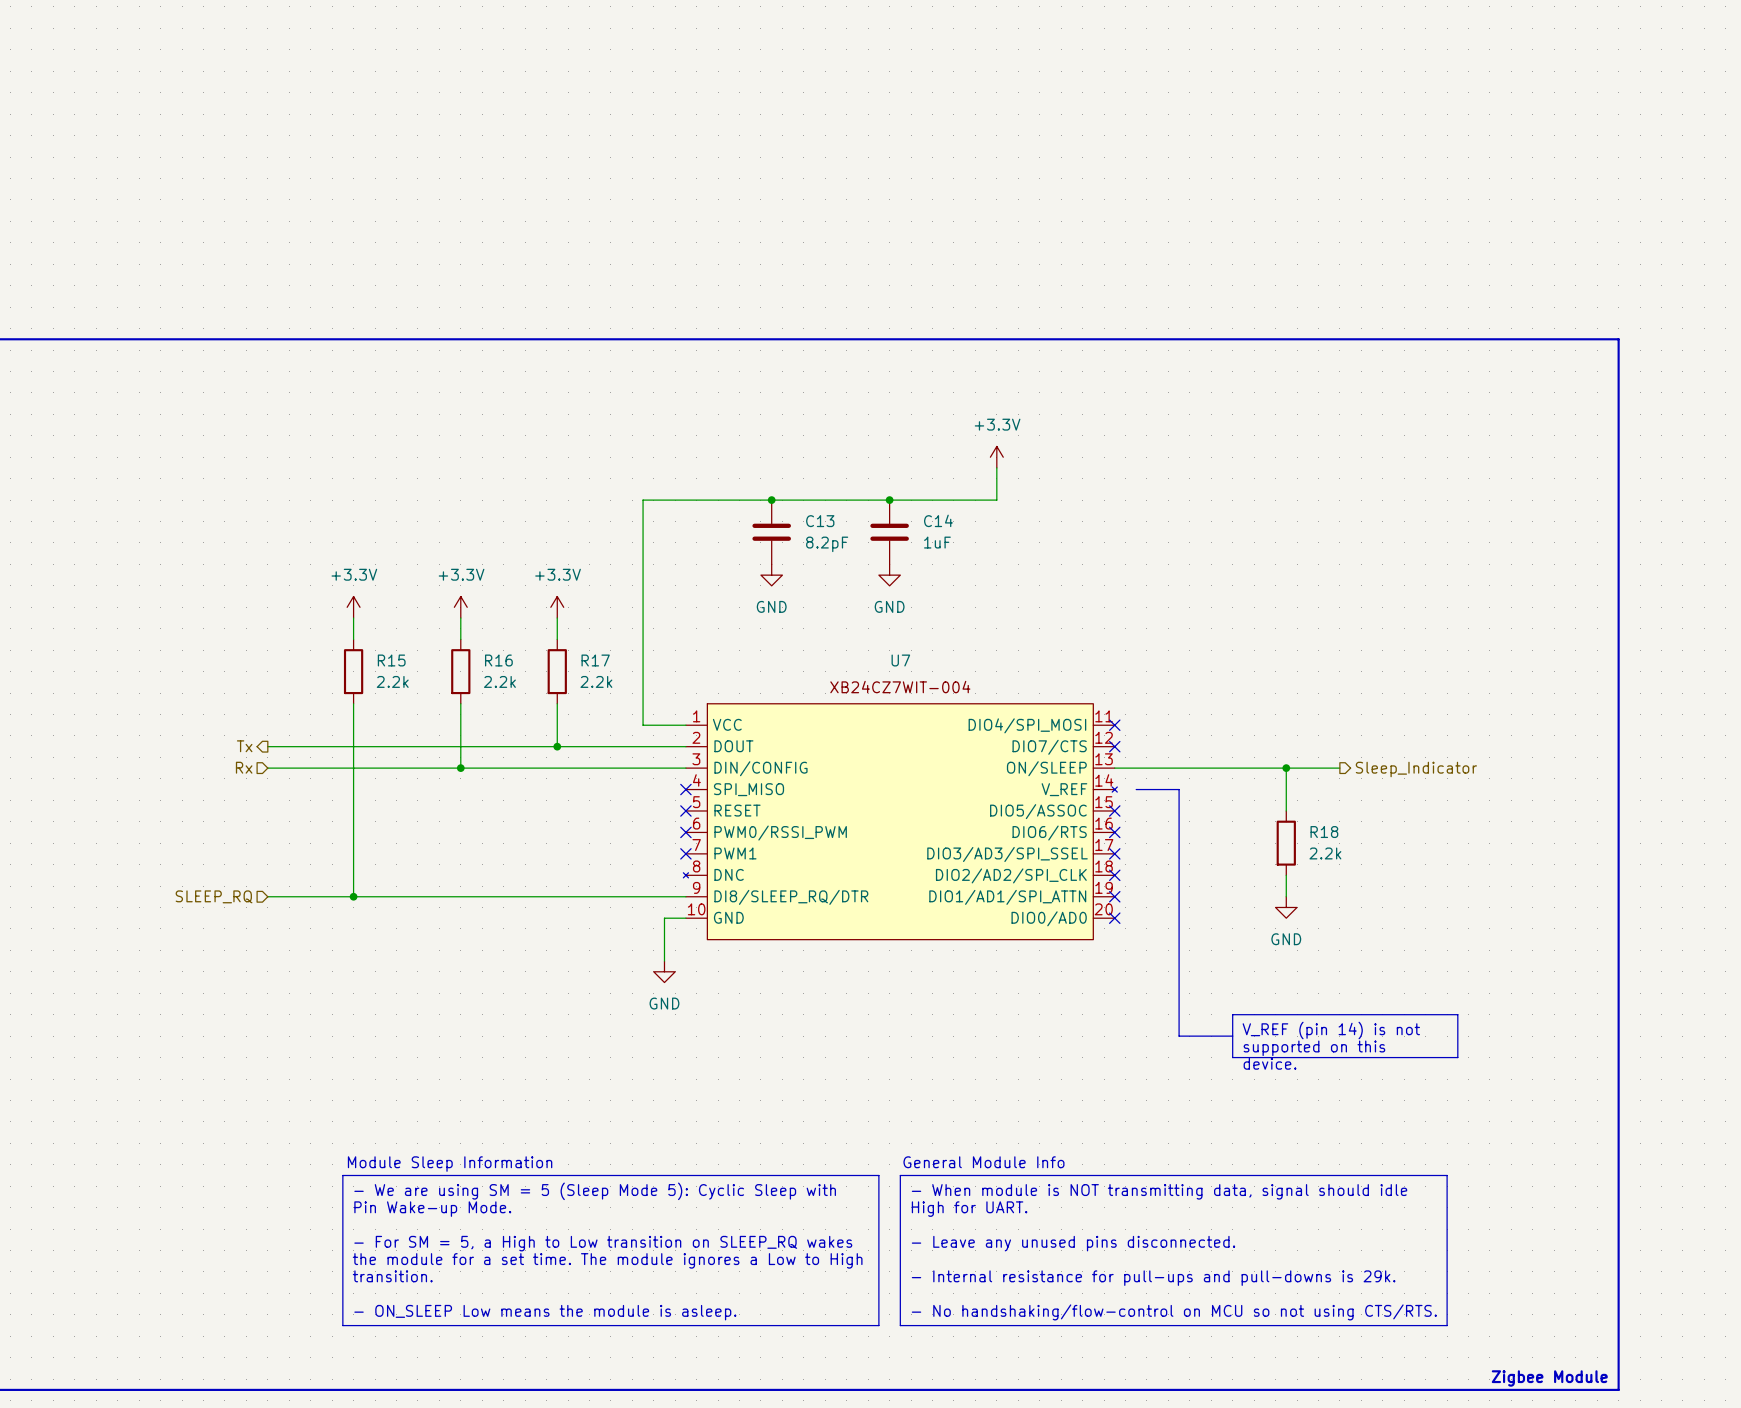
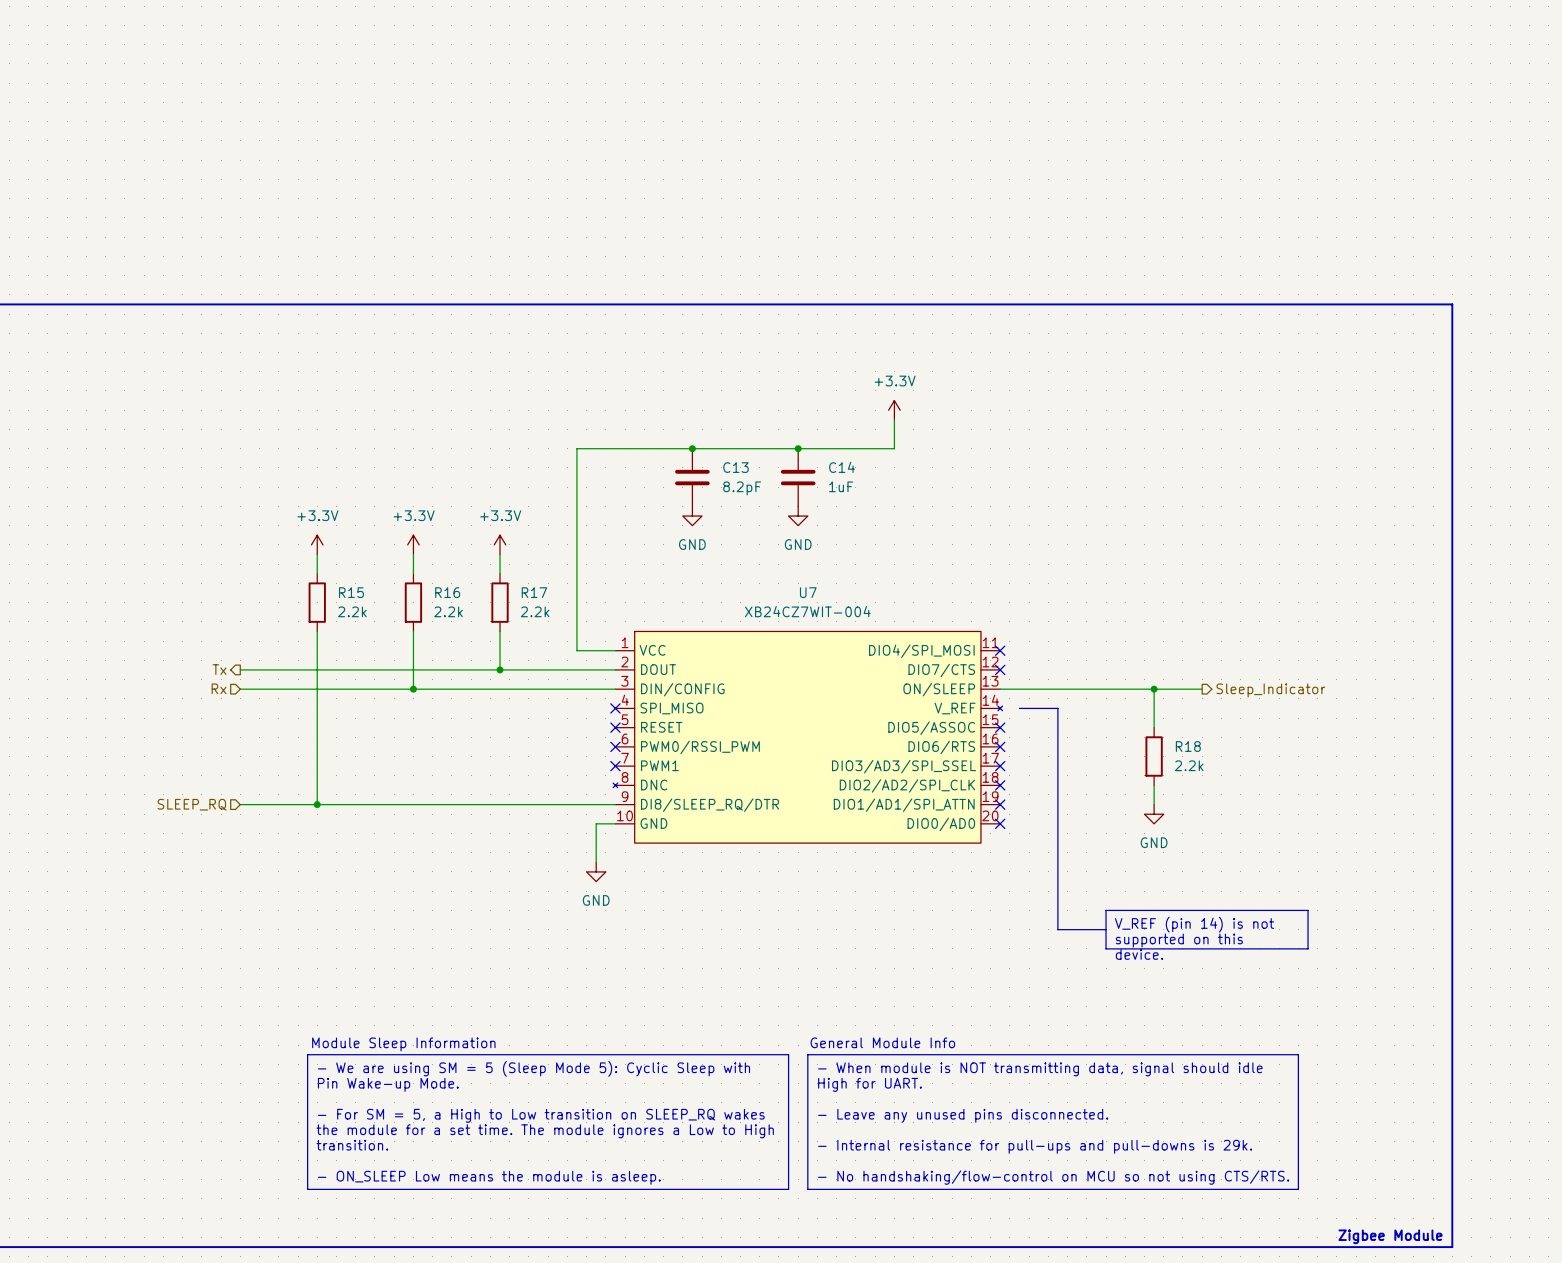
U7 value: none -> XB24CZ7WIT-004 (807, 611)
U7 text: XB24CZ7WIT-004 (900, 687) -> none

